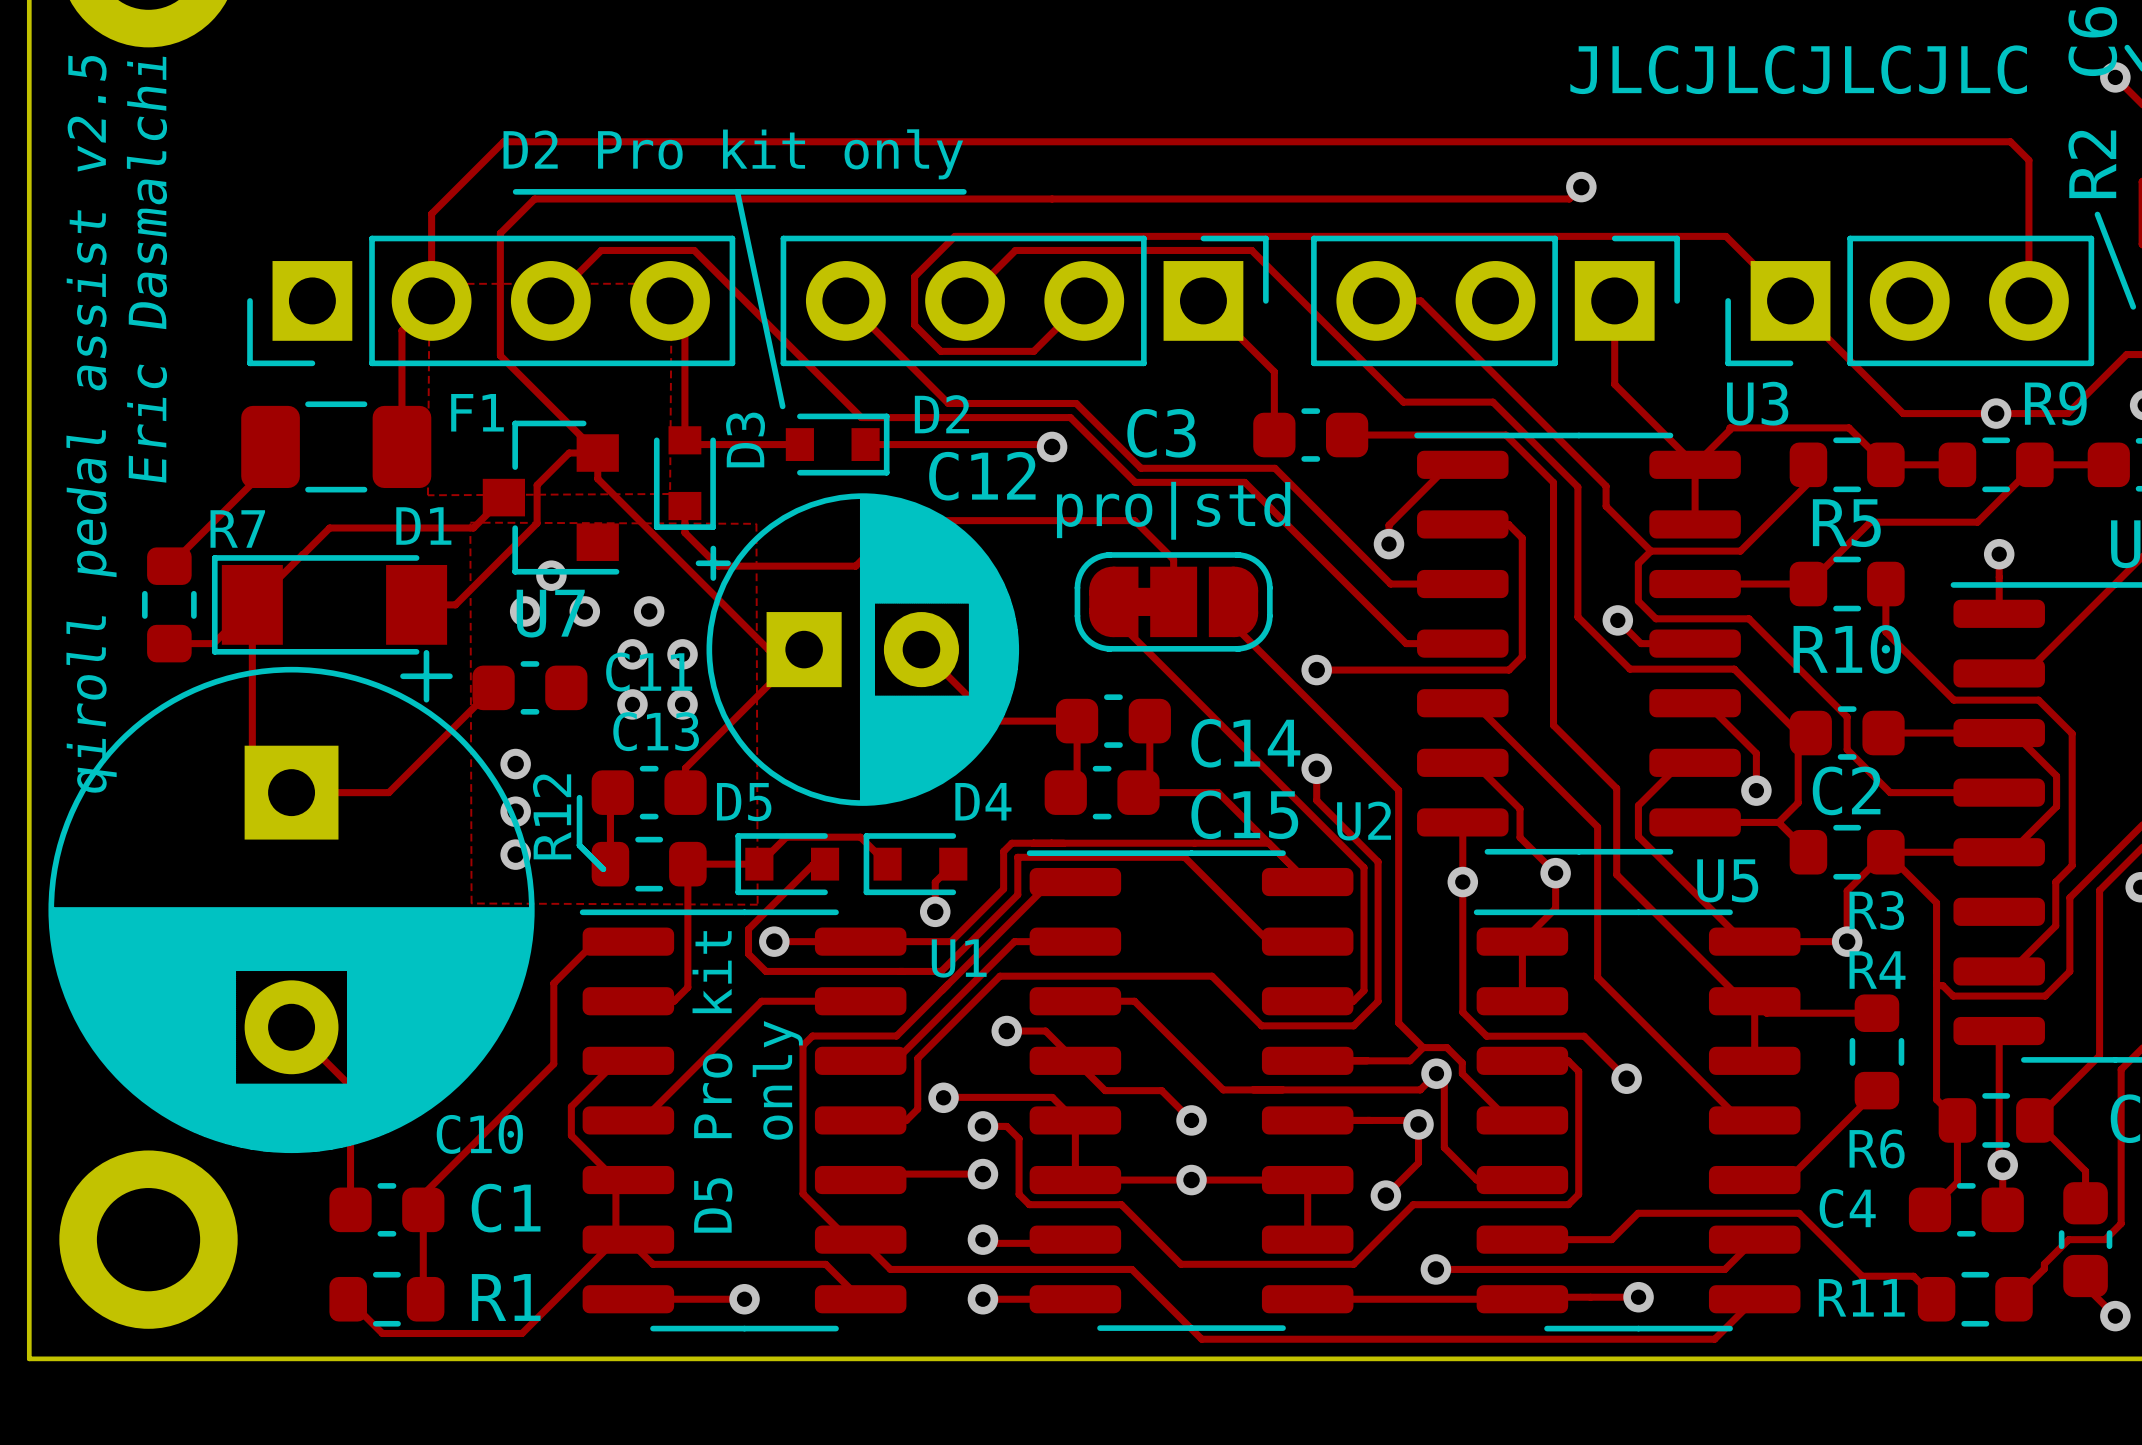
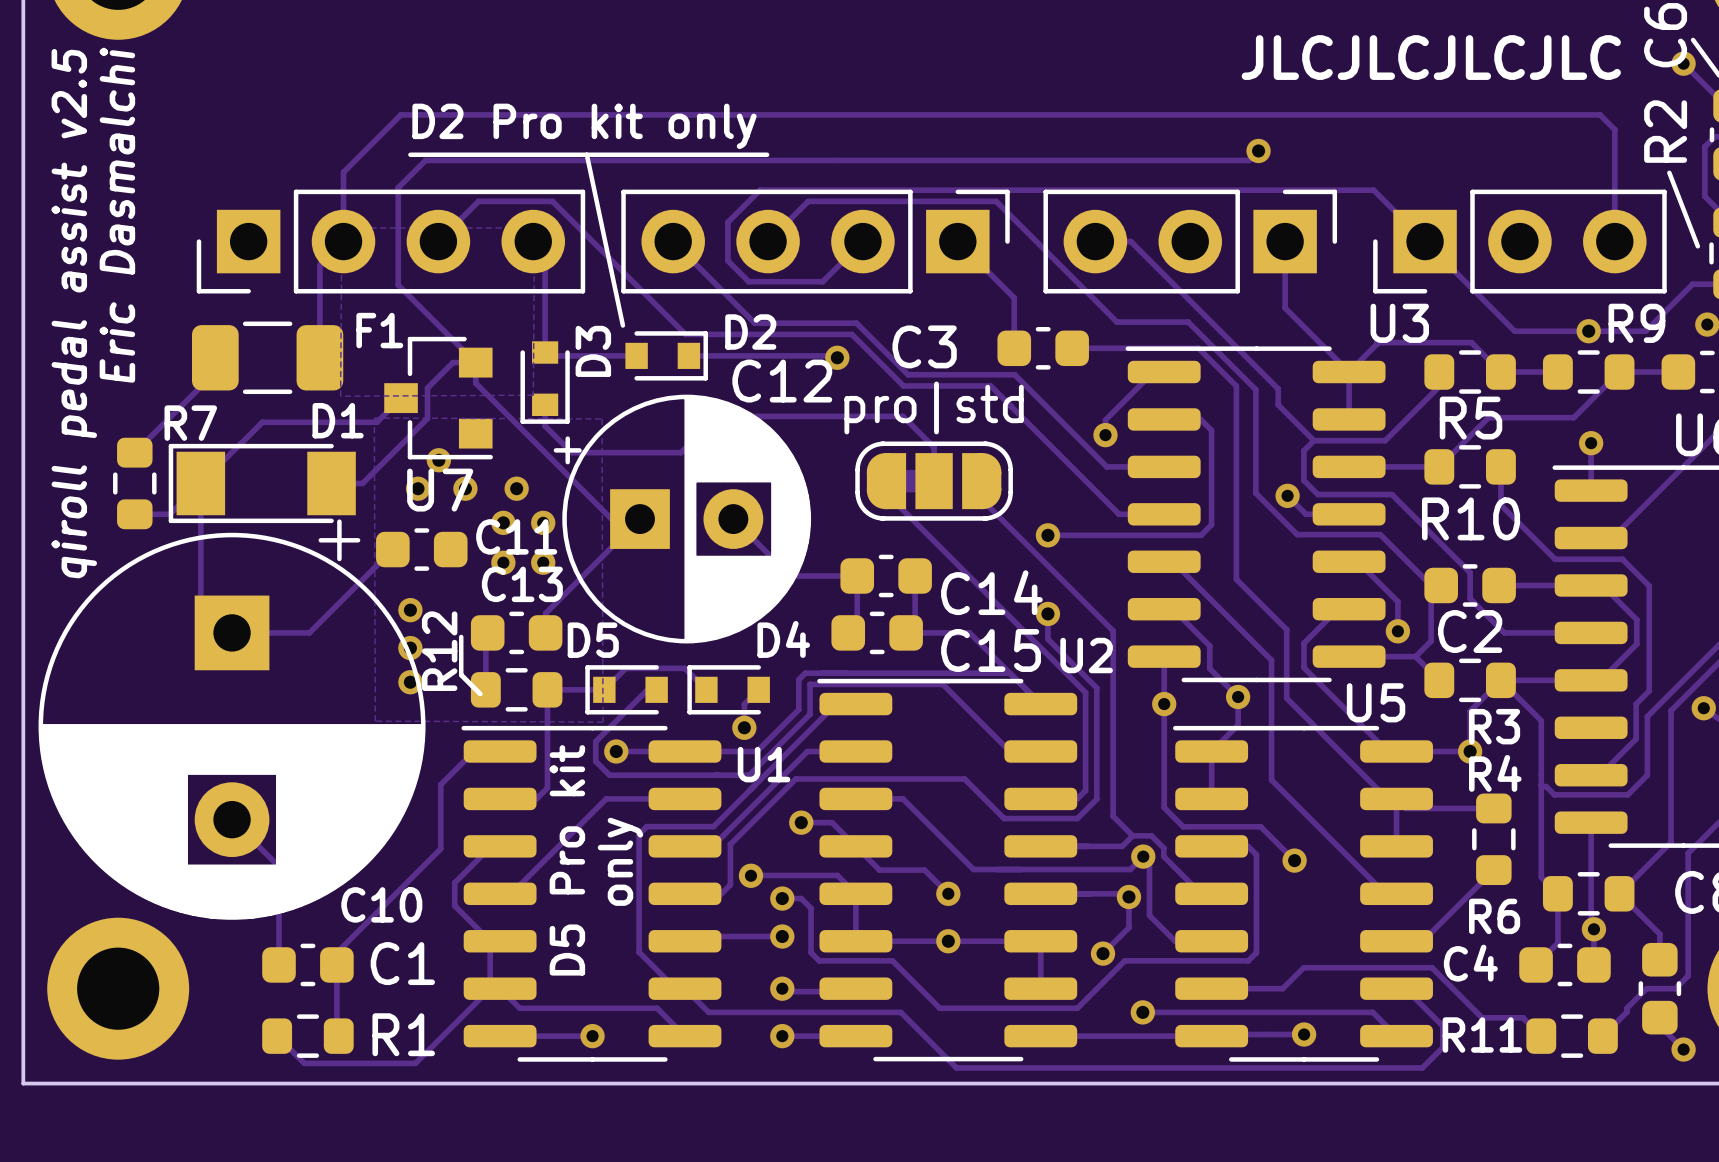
track: (1754, 1239) (1724, 1269) -> (1396, 1036) (1372, 1012)
track: (1754, 1299) (1714, 1339) -> (1405, 988) (1442, 1026) (1442, 1047) (1422, 1067) (1364, 1067)

